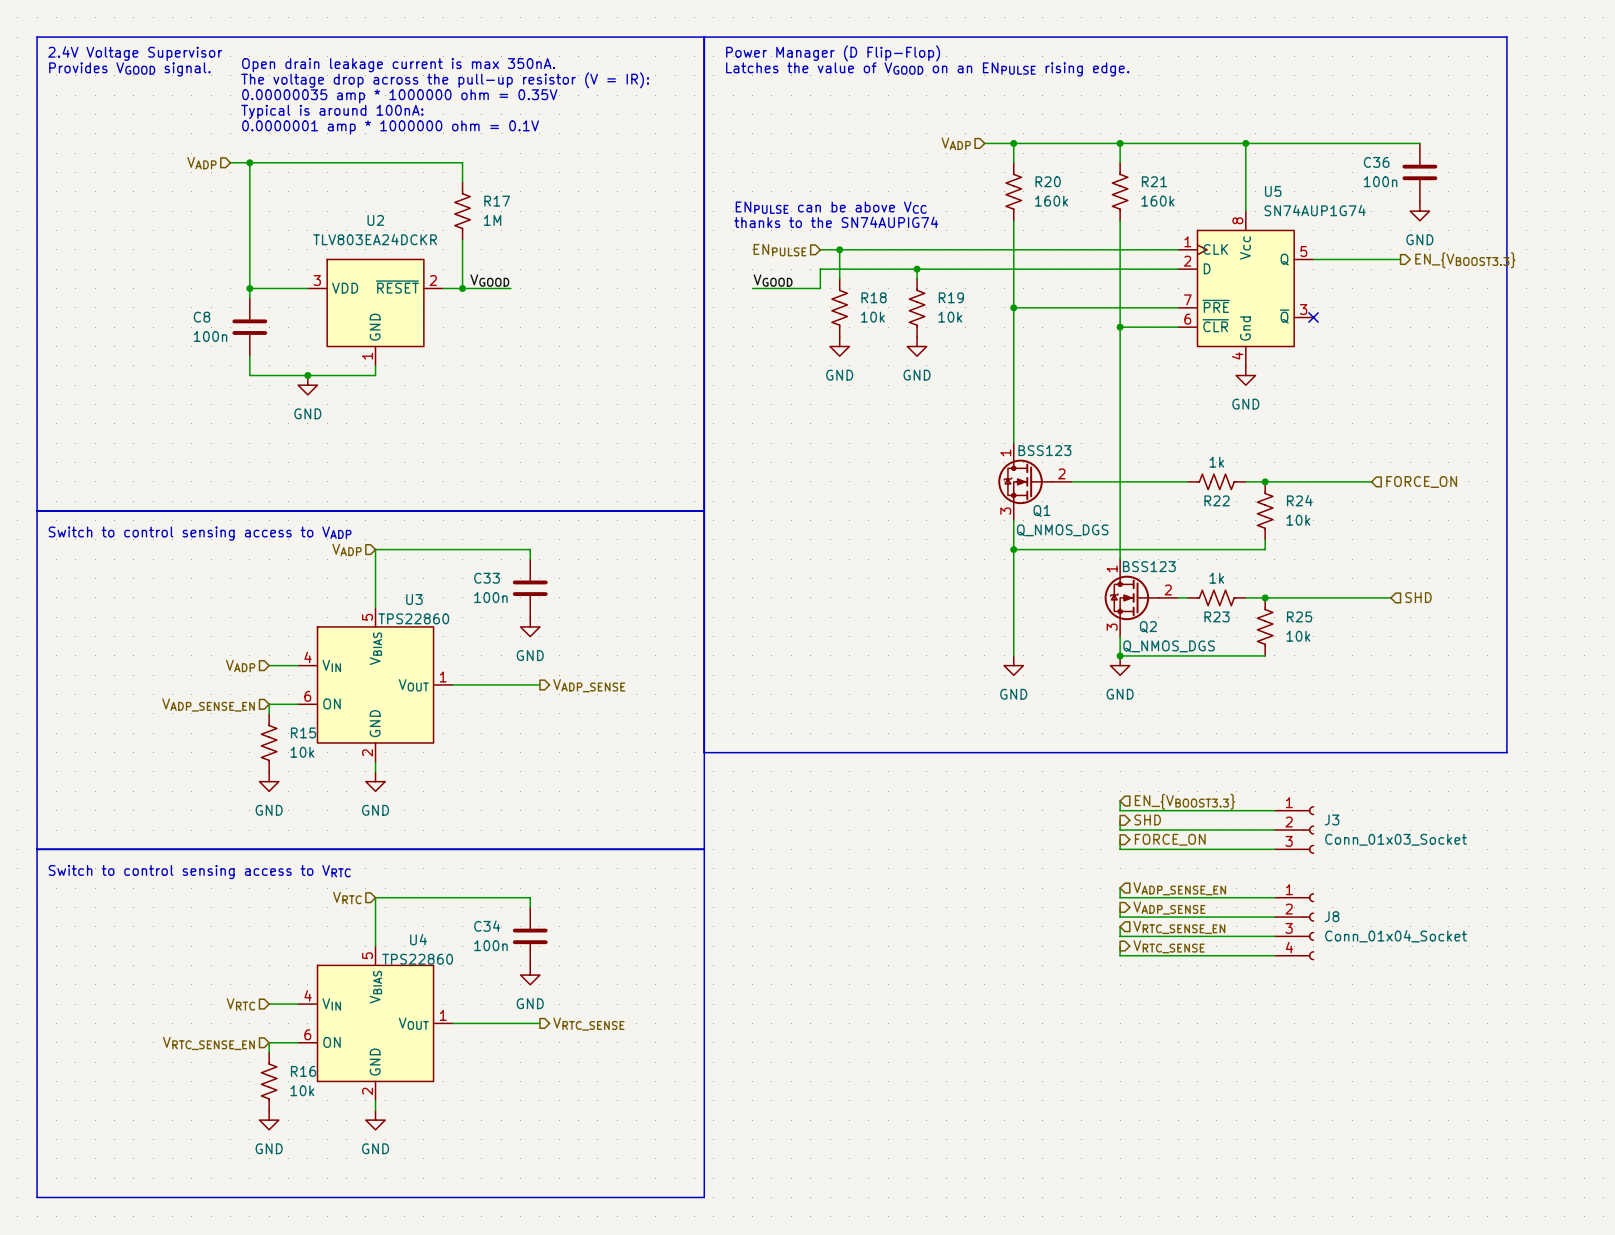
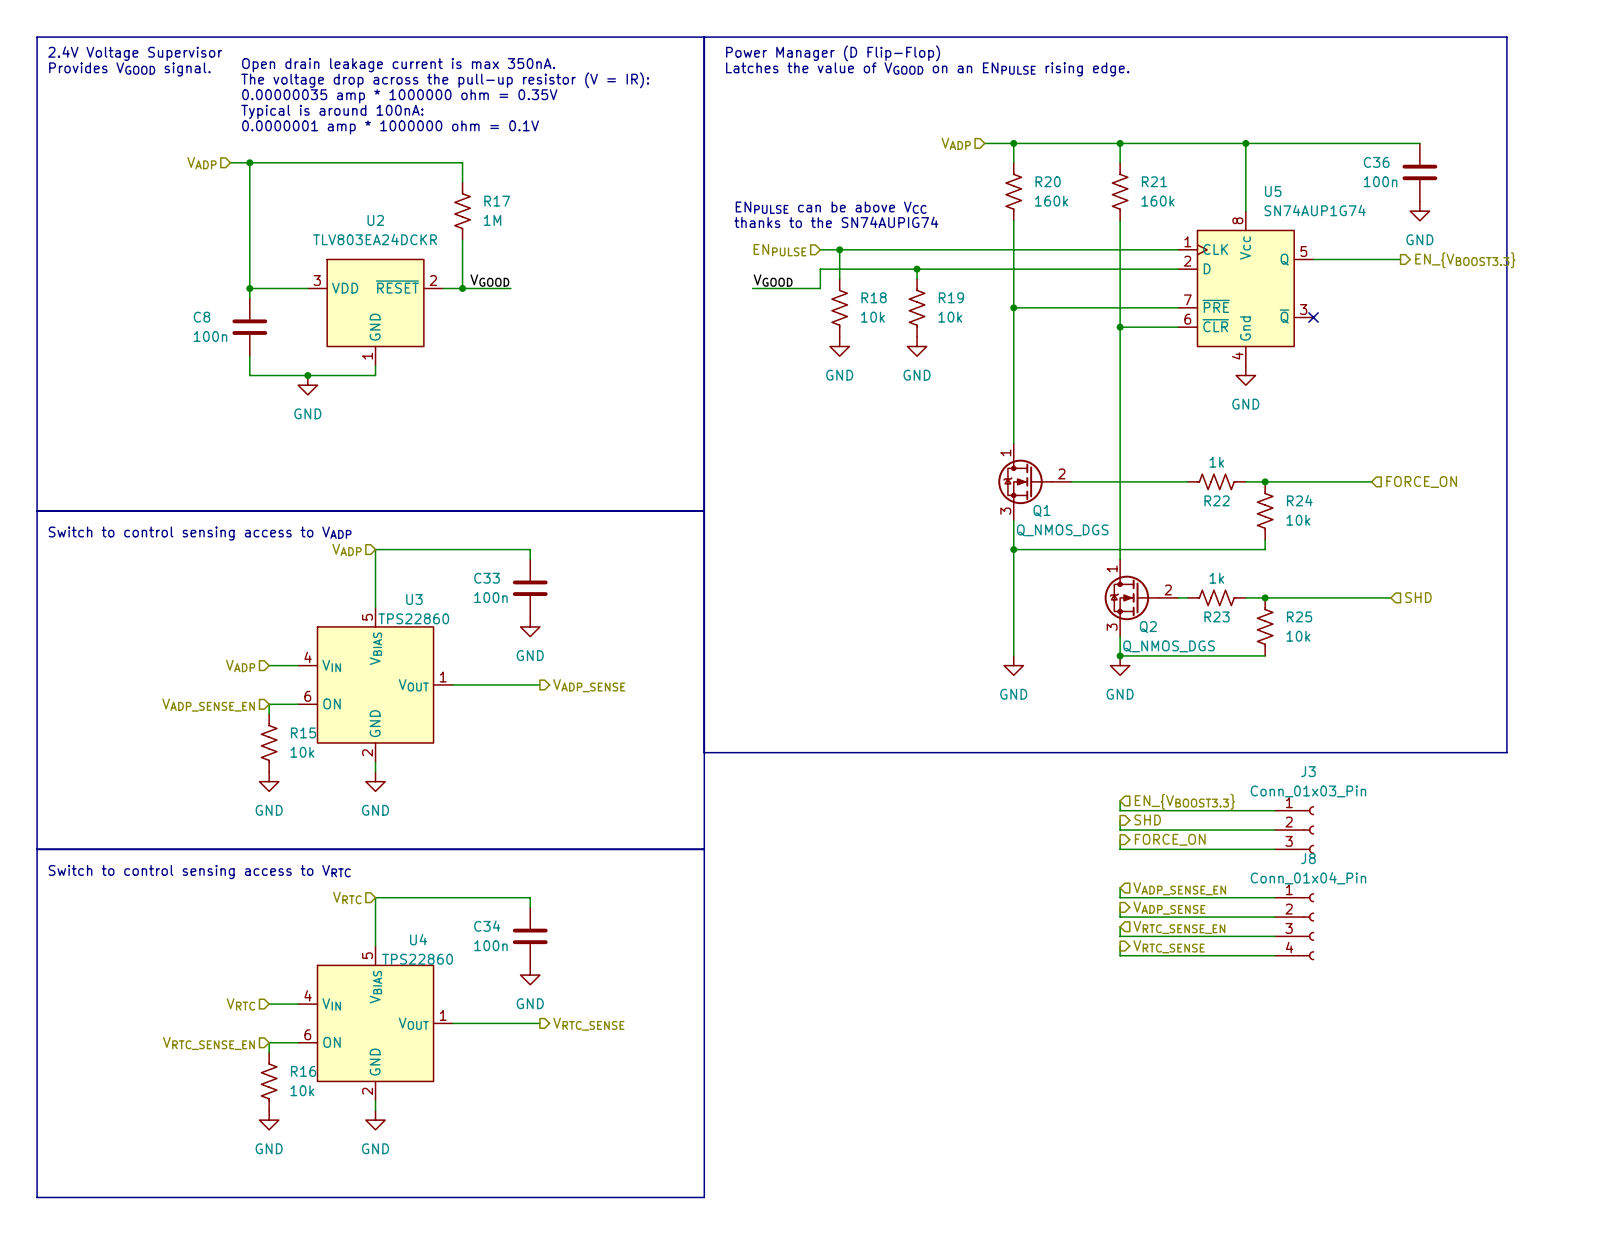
Q1 text: BSS123 (1044, 450) -> none
Q2 text: BSS123 (1149, 566) -> none
J3 name position: J3 (1332, 819) -> J3 (1308, 771)
J3 value: Conn_01x03_Socket (1396, 839) -> Conn_01x03_Pin (1308, 791)
J8 name position: J8 (1332, 916) -> J8 (1308, 858)
J8 value: Conn_01x04_Socket (1396, 936) -> Conn_01x04_Pin (1308, 878)

